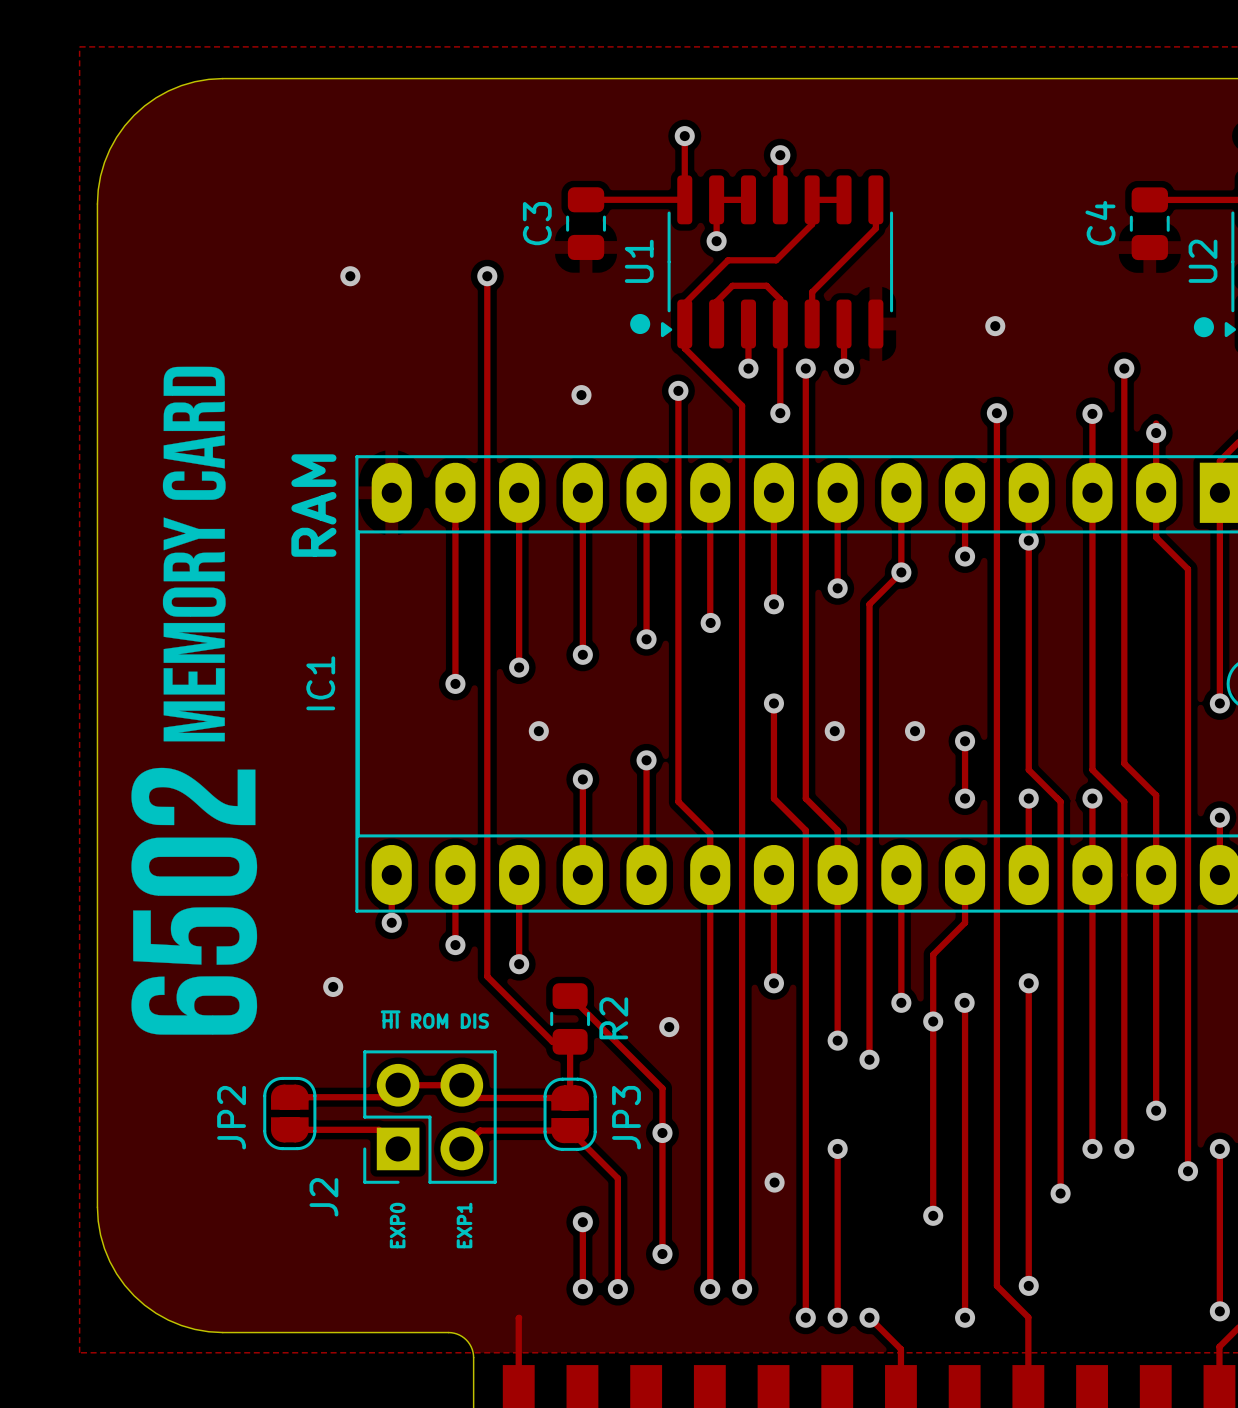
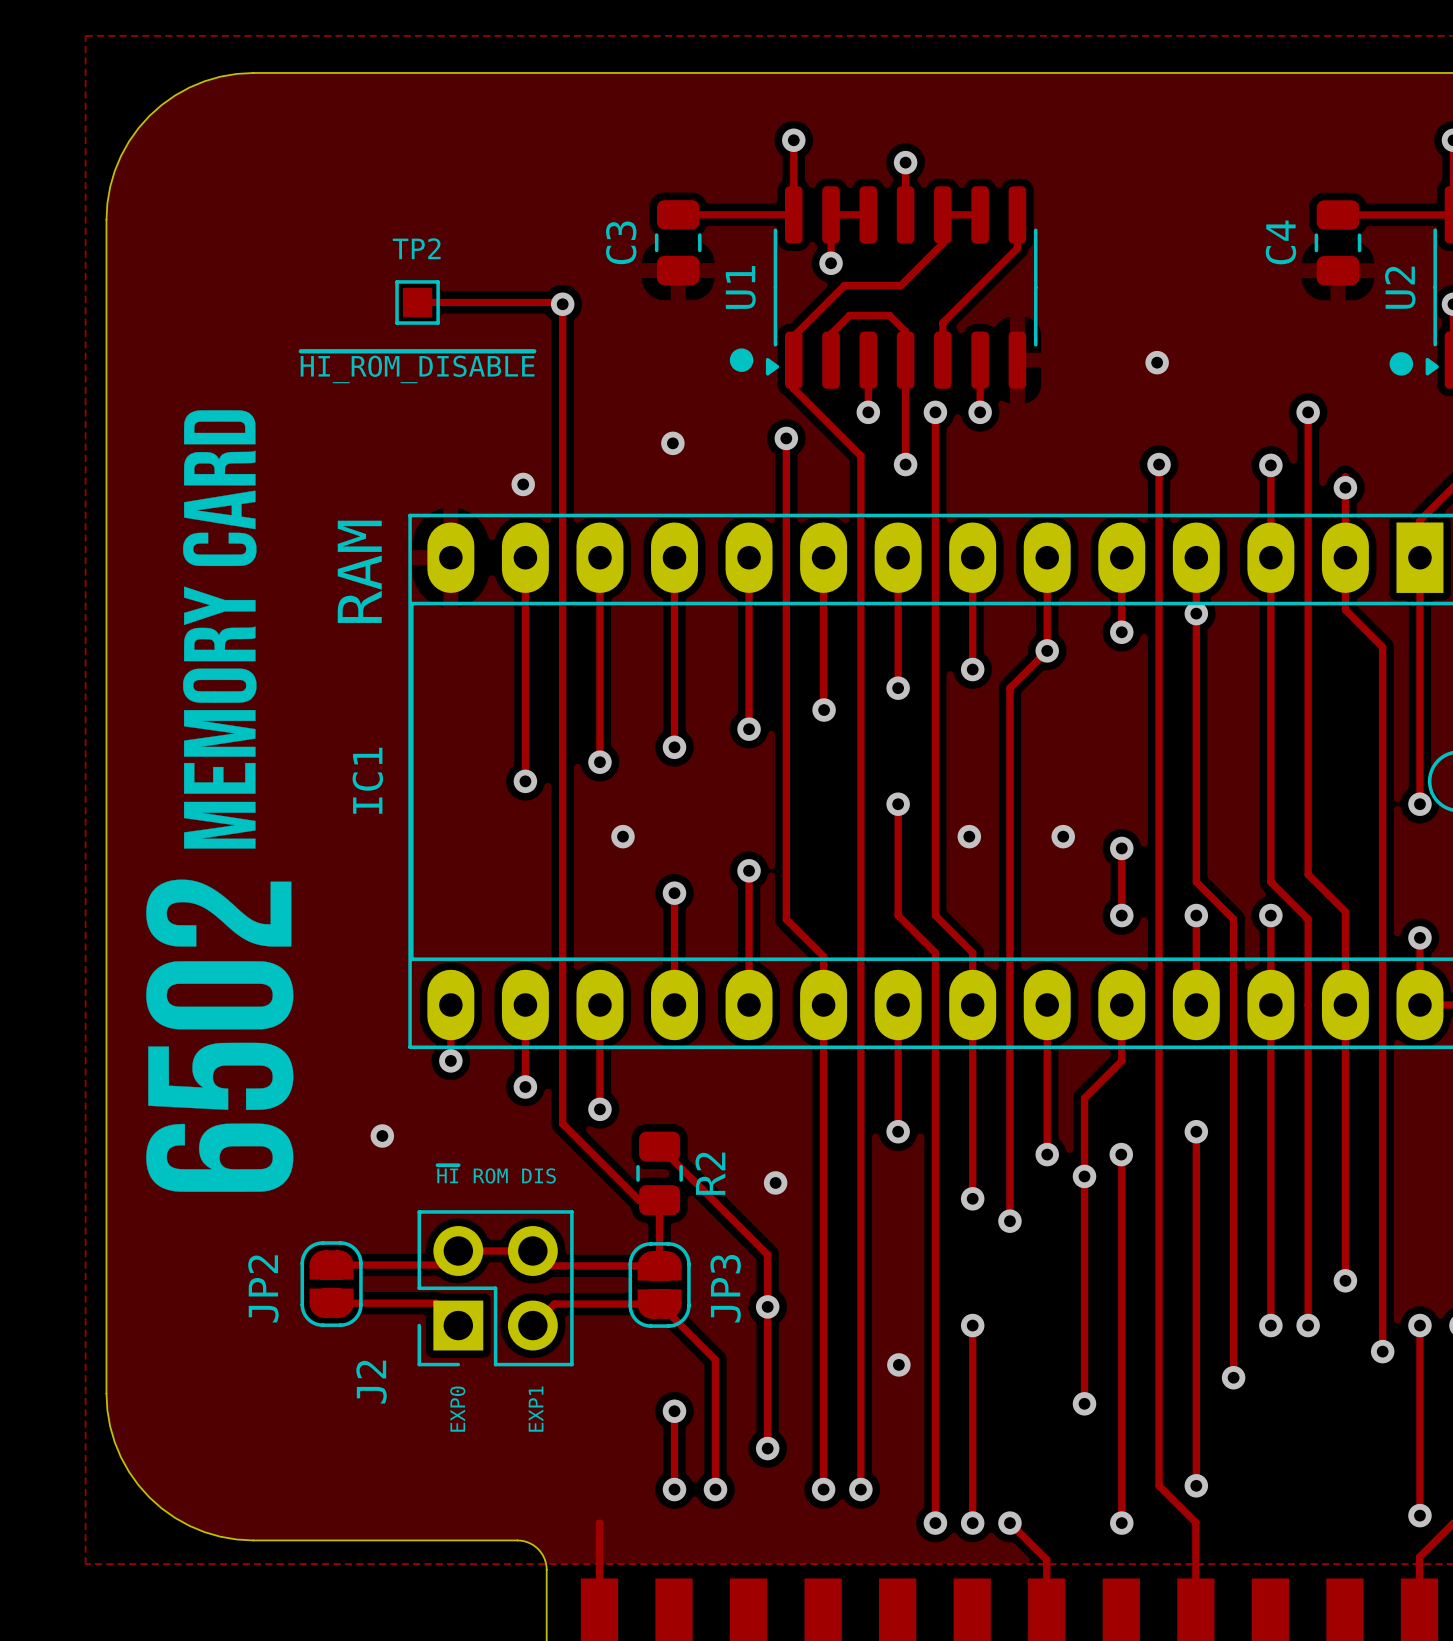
track: none -> (417, 302) (560, 302) (562, 304)
TP2: none -> ~{HI_ROM_DISABLE} (417, 302)
via: (350, 276) -> none
via: none -> (523, 484)

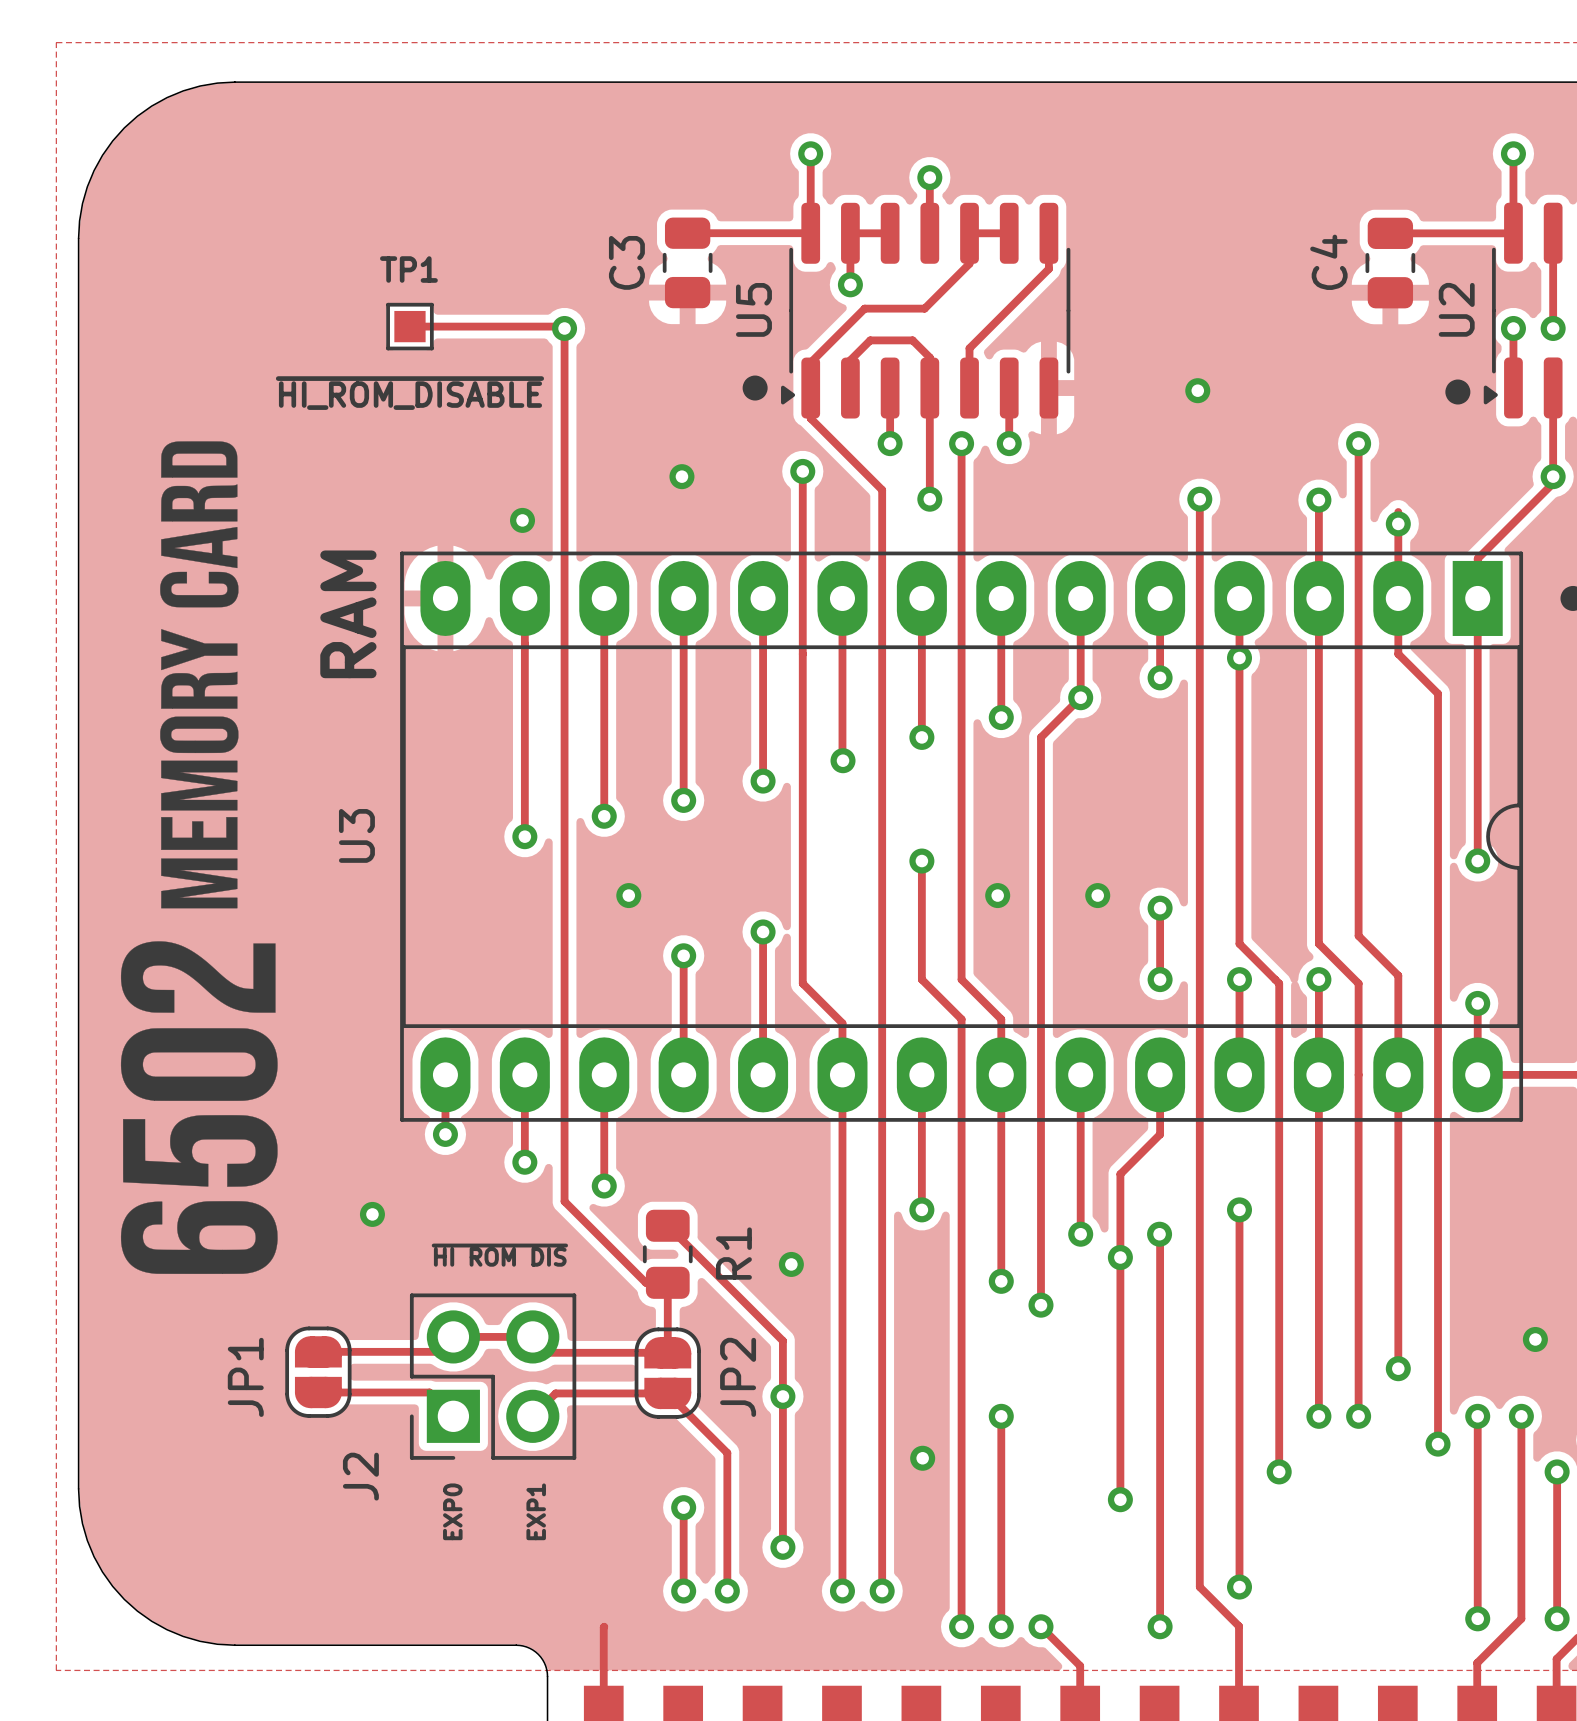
TP2 name: TP2 (416, 248) -> TP1 (408, 269)
U1 name: U1 (740, 287) -> U5 (753, 309)
IC1 name: IC1 (367, 780) -> U3 (356, 835)
R2 name: R2 (710, 1173) -> R1 (733, 1253)
text: ~{HI} ROM DIS (496, 1174) -> ~{HI ROM DIS} (499, 1255)
JP2 name: JP2 (263, 1288) -> JP1 (245, 1377)
JP3 name: JP3 (725, 1288) -> JP2 (738, 1377)

